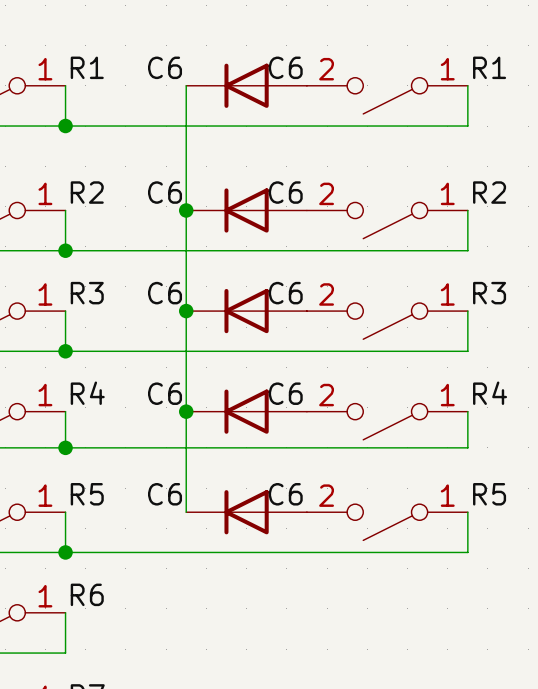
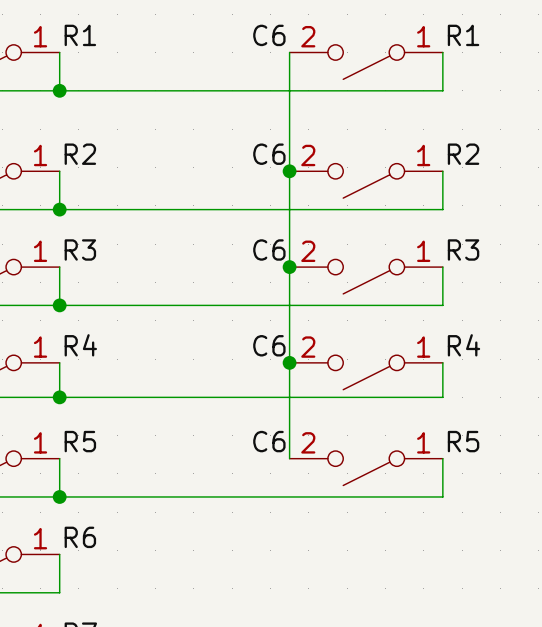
label: C6 (165, 67) -> none
wire: (186, 85) (186, 512) -> (289, 52) (289, 458)
part: (246, 85) -> none
label: C6 (165, 192) -> none
junction: (186, 210) -> none
part: (246, 210) -> none
junction: none -> (289, 171)
label: C6 (165, 293) -> none
junction: (186, 311) -> none
part: (246, 311) -> none
junction: none -> (289, 267)
label: C6 (165, 393) -> none
junction: (186, 411) -> none
part: (246, 411) -> none
junction: none -> (289, 362)
label: C6 (165, 494) -> none
part: (246, 512) -> none

